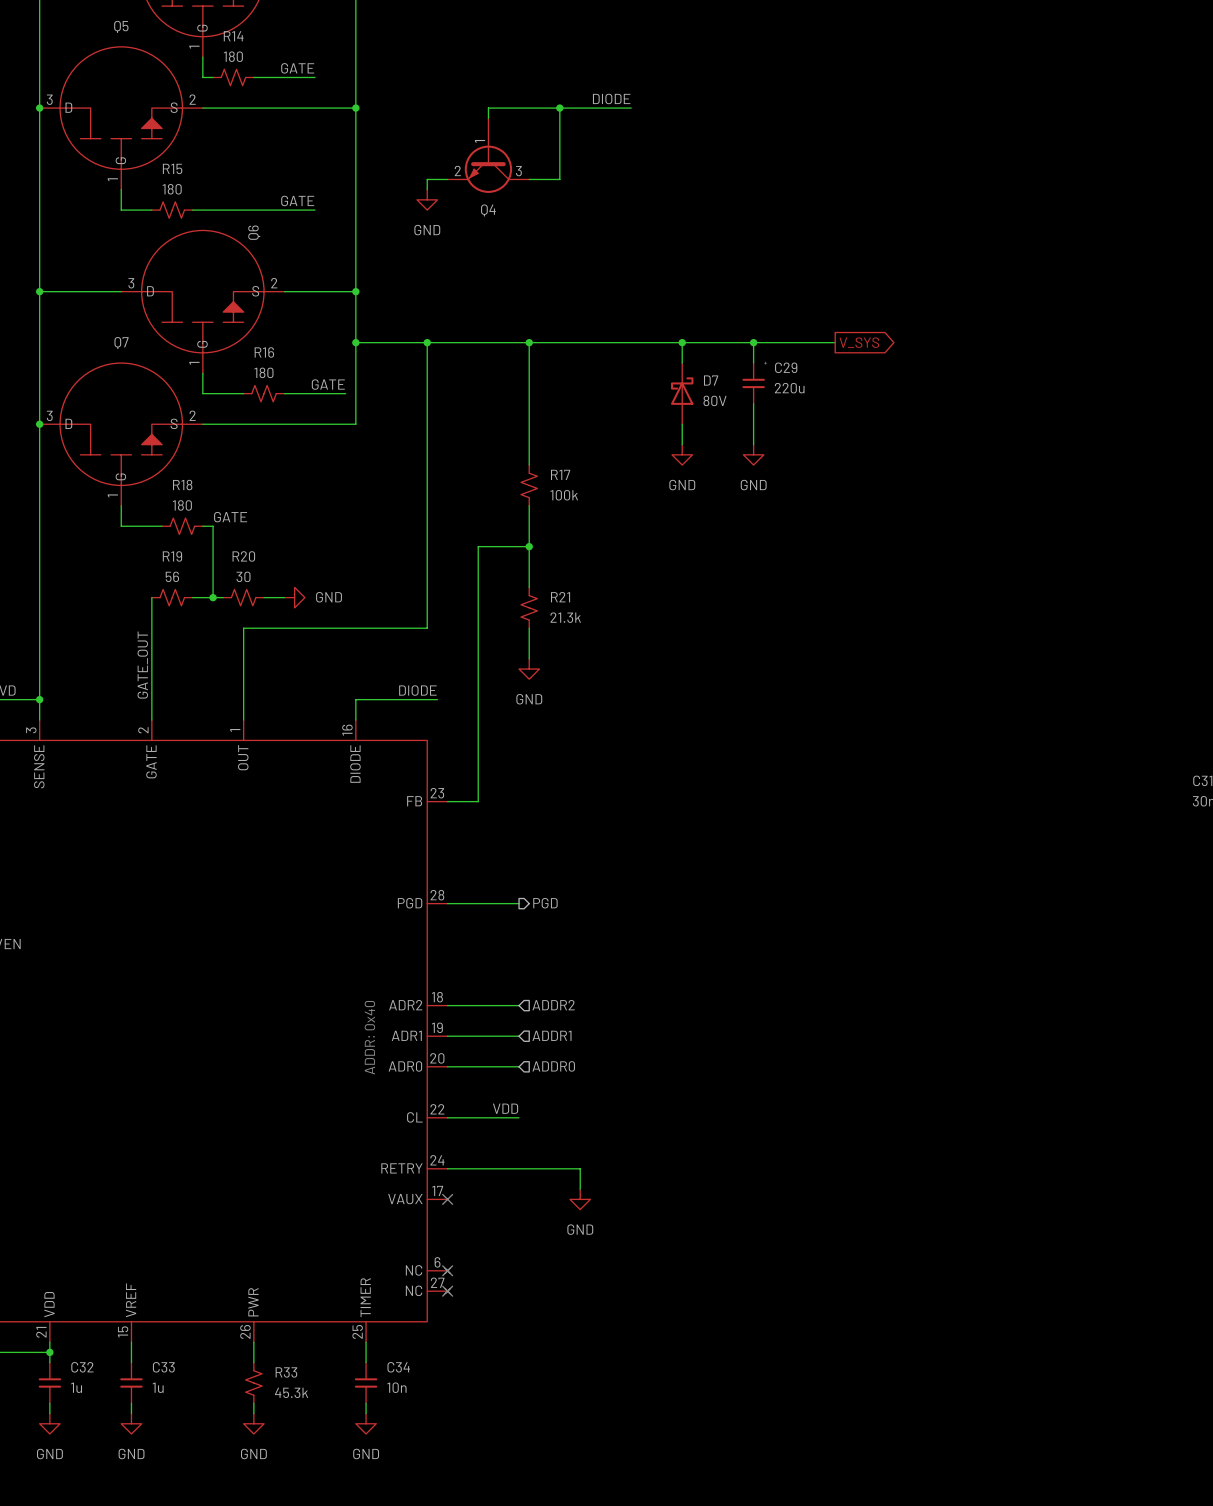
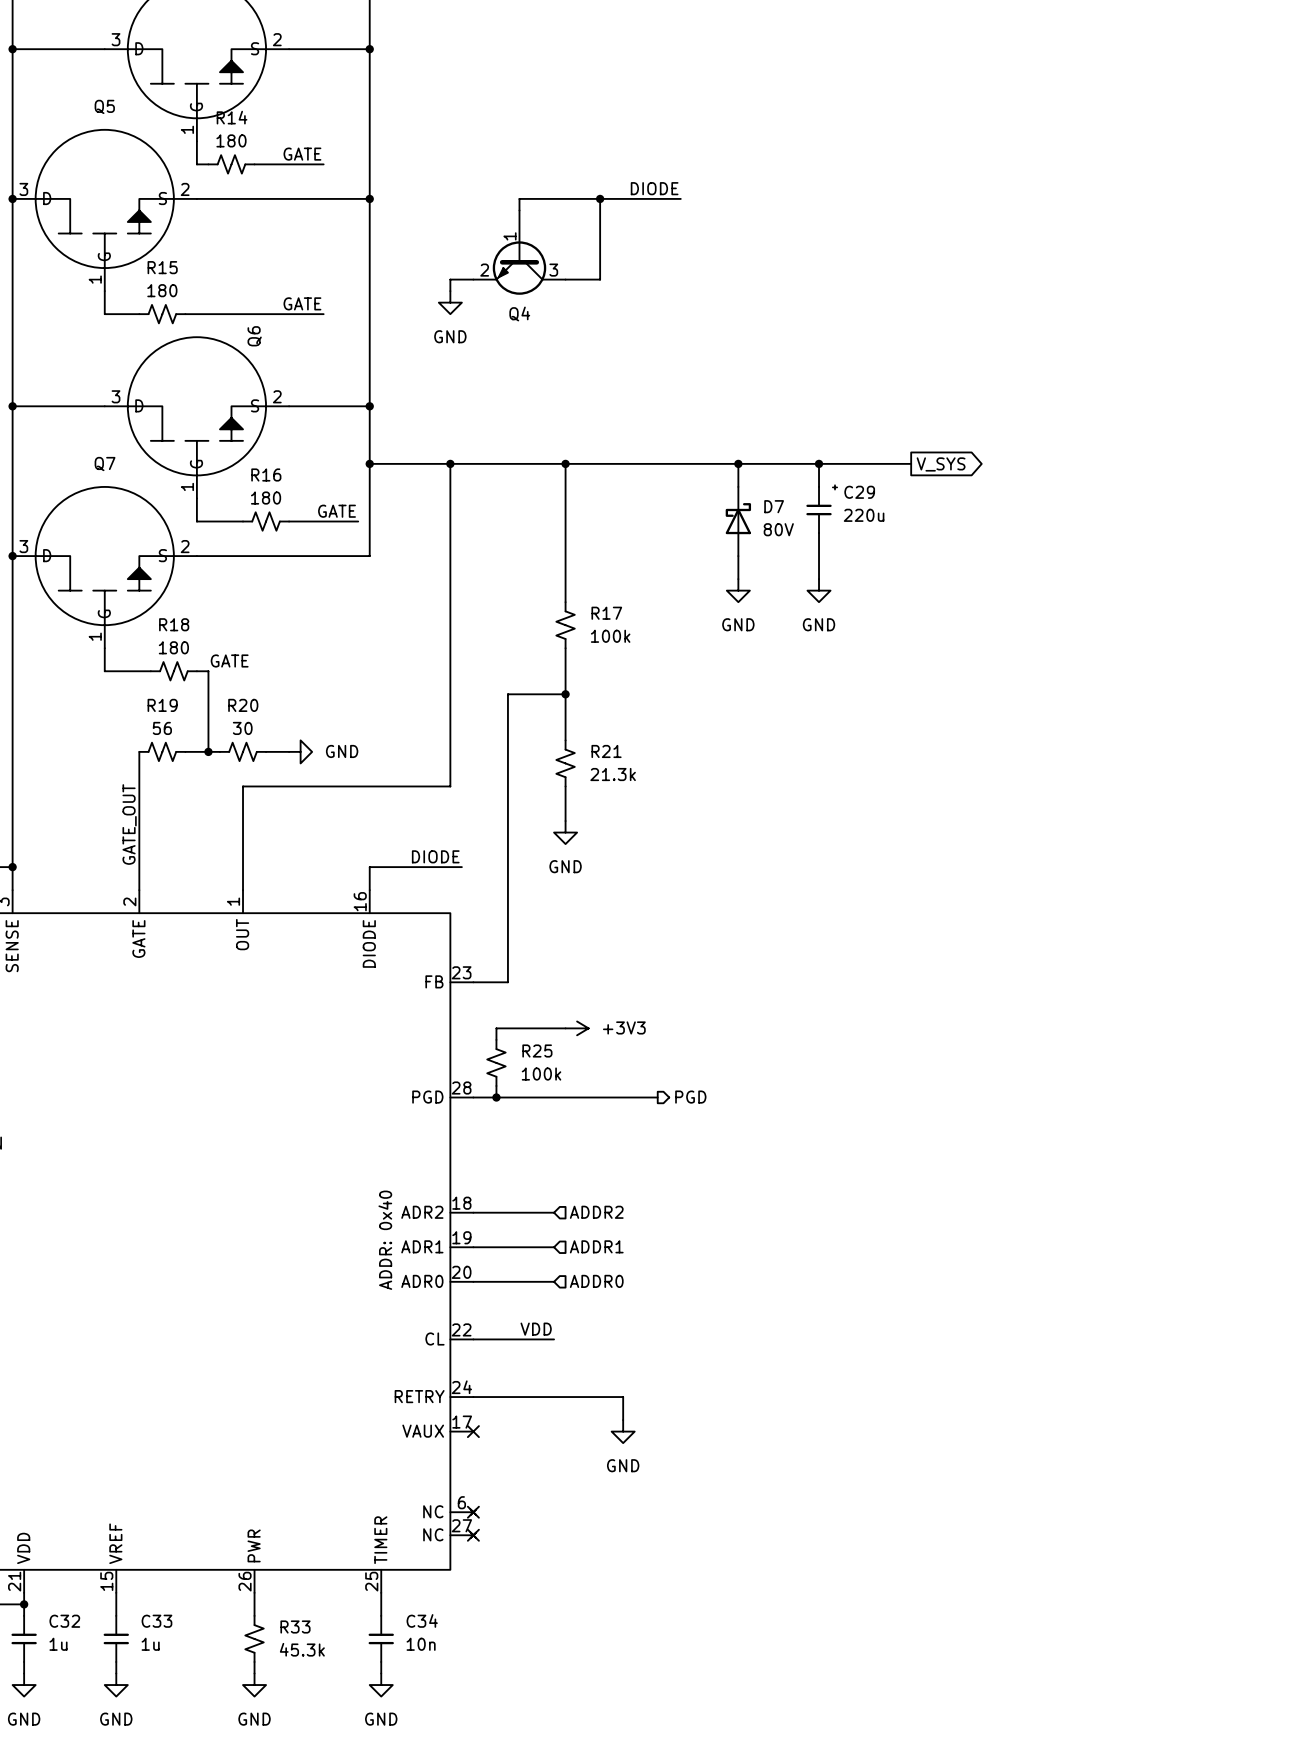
wire: none -> (565, 1028) (496, 1028) (496, 1039)
power symbol: none -> +3V3 (577, 1028)
R25: none -> 100k (496, 1062)
wire: none -> (496, 1085) (496, 1097)
junction: none -> (496, 1097)
wire: none -> (554, 1097) (657, 1097)
hierarchical label position: PGD (545, 903) -> PGD (690, 1097)

